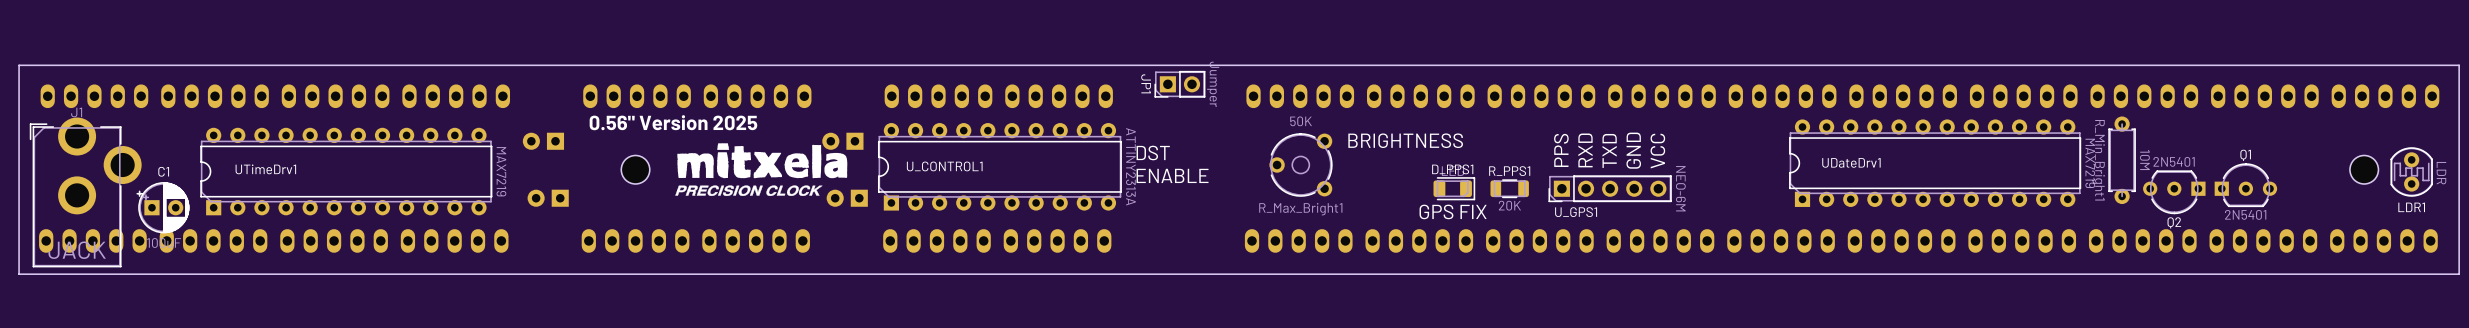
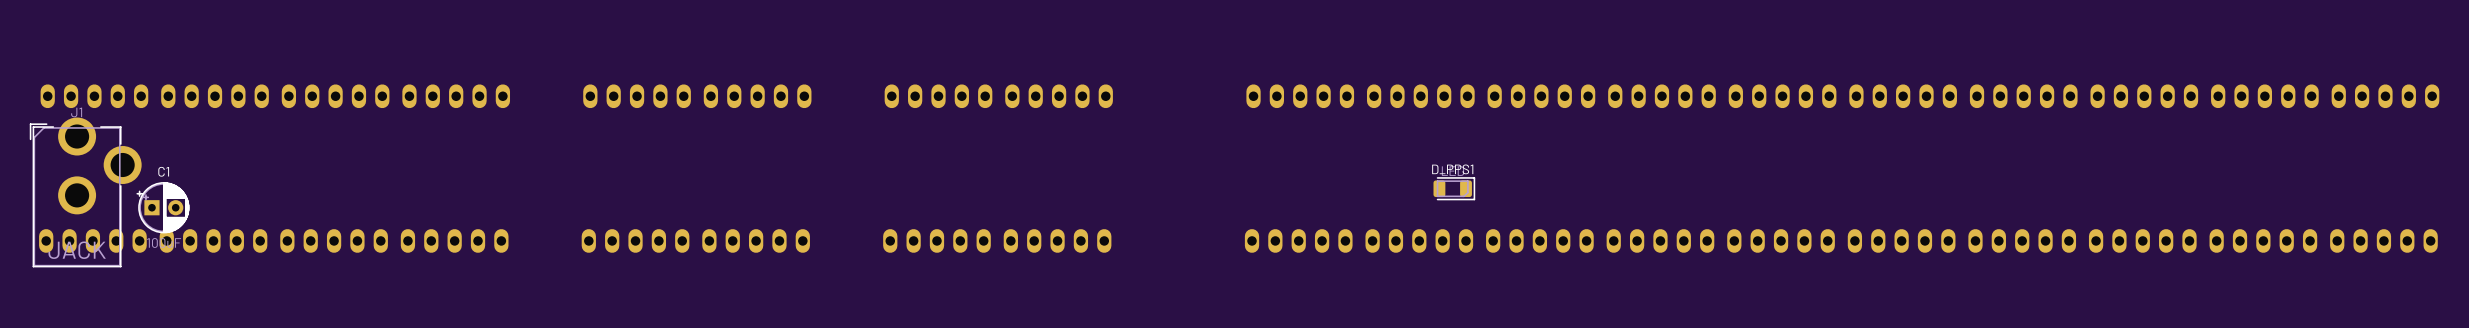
board edge: (2459, 65) (2459, 274) (19, 274) (19, 65) (2459, 65) -> none
JP1: Jumper (1179, 84) -> none
text: 0.56" Version 2025 (673, 122) -> none
text: BRIGHTNESS (1405, 140) -> none
part: (543, 141) -> none
part: (842, 141) -> none
drawing: [675, 143, 848, 197] -> none
text: PPS (1561, 150) -> none
text: RXD (1585, 150) -> none
text: TXD (1609, 150) -> none
text: GND (1633, 150) -> none
text: VCC (1657, 151) -> none
text: DST (1153, 153) -> none
R_Min_Bright1: 10M (2122, 160) -> none
UDateDrv1: MAX7219 (1935, 163) -> none
R_Max_Bright1: 50K (1300, 164) -> none
U_CONTROL1: ATTINY2313A (999, 166) -> none
part: (635, 169) -> none
part: (2364, 169) -> none
UTimeDrv1: MAX7219 (346, 171) -> none
LDR1: LDR (2411, 171) -> none
text: ENABLE (1172, 175) -> none
Q1: 2N5401 (2245, 185) -> none
R_PPS1: 20K (1509, 188) -> none
U_GPS1: NEO-6M (1610, 188) -> none
Q2: 2N5401 (2174, 192) -> none
part: (548, 198) -> none
part: (847, 198) -> none
text: GPS FIX (1453, 211) -> none

